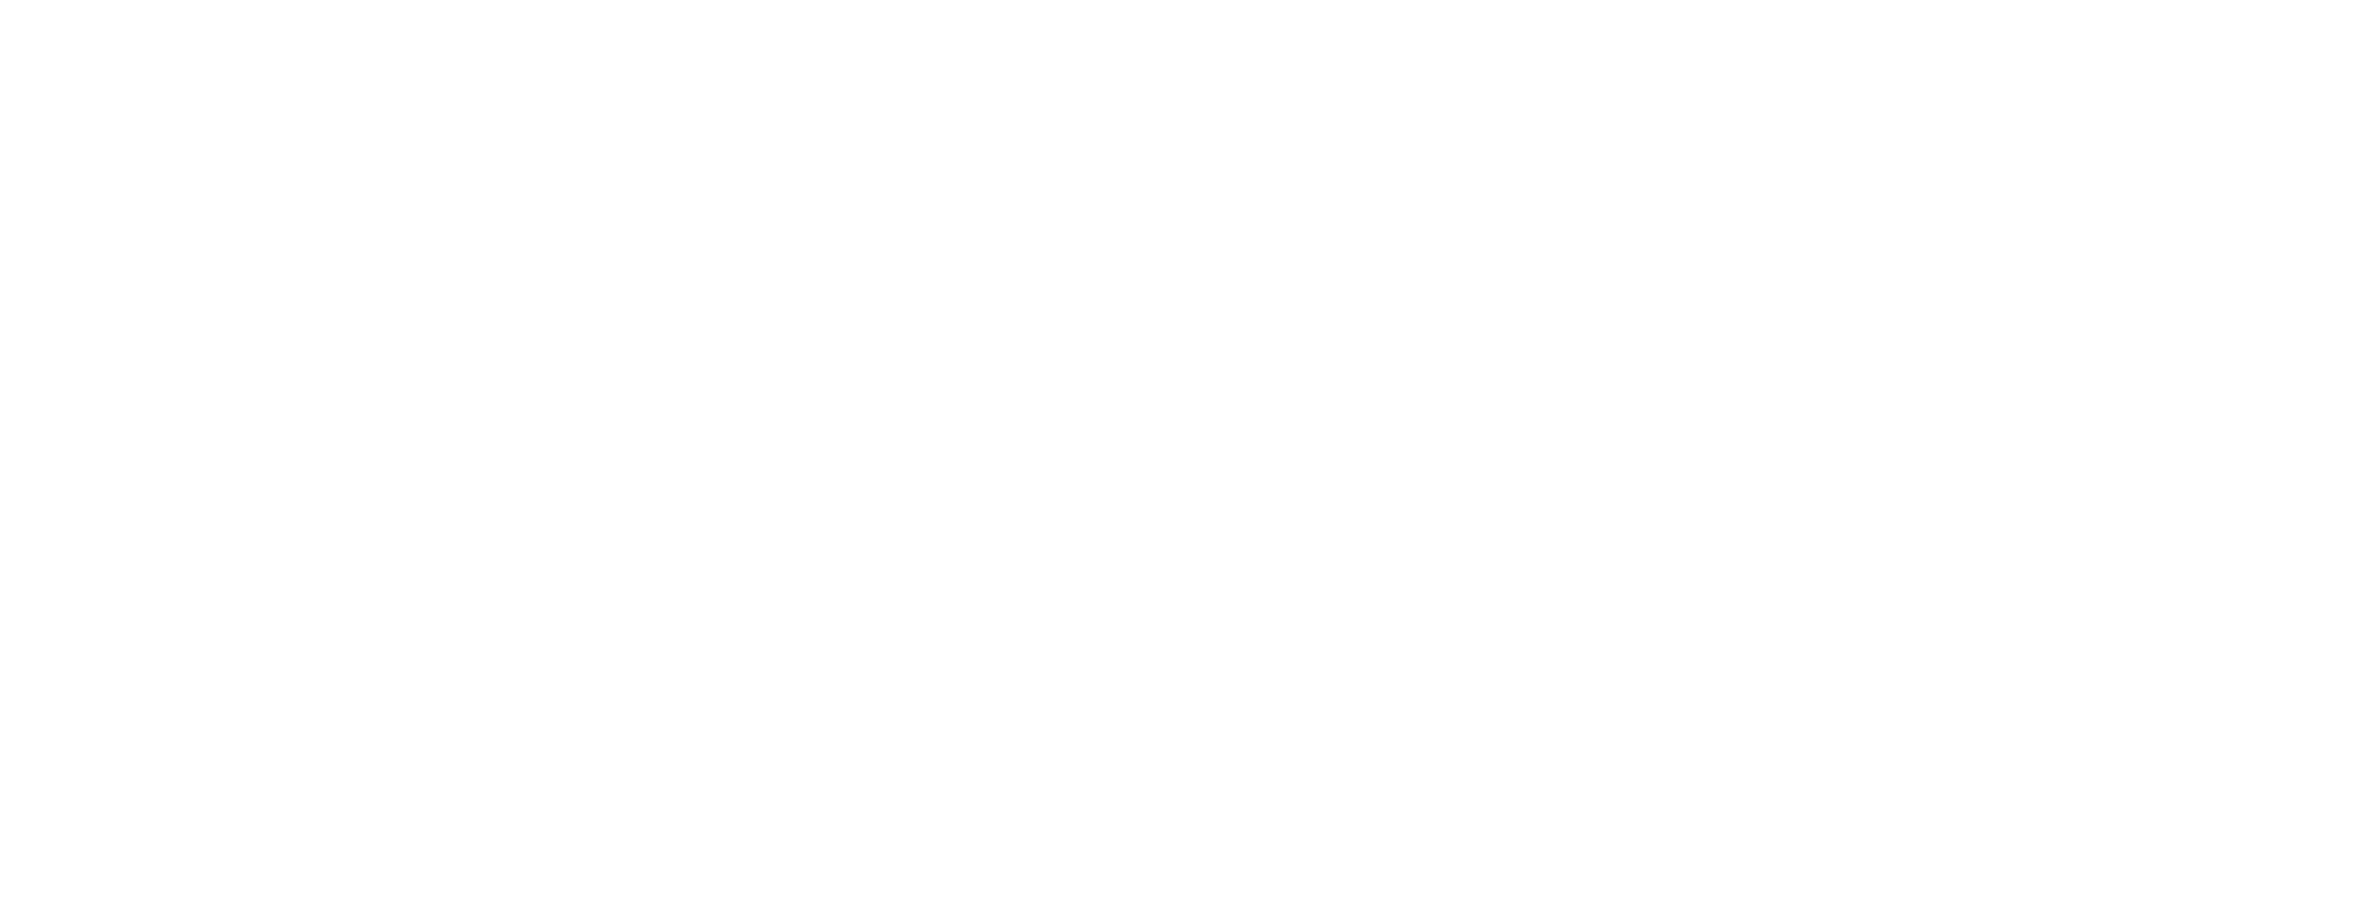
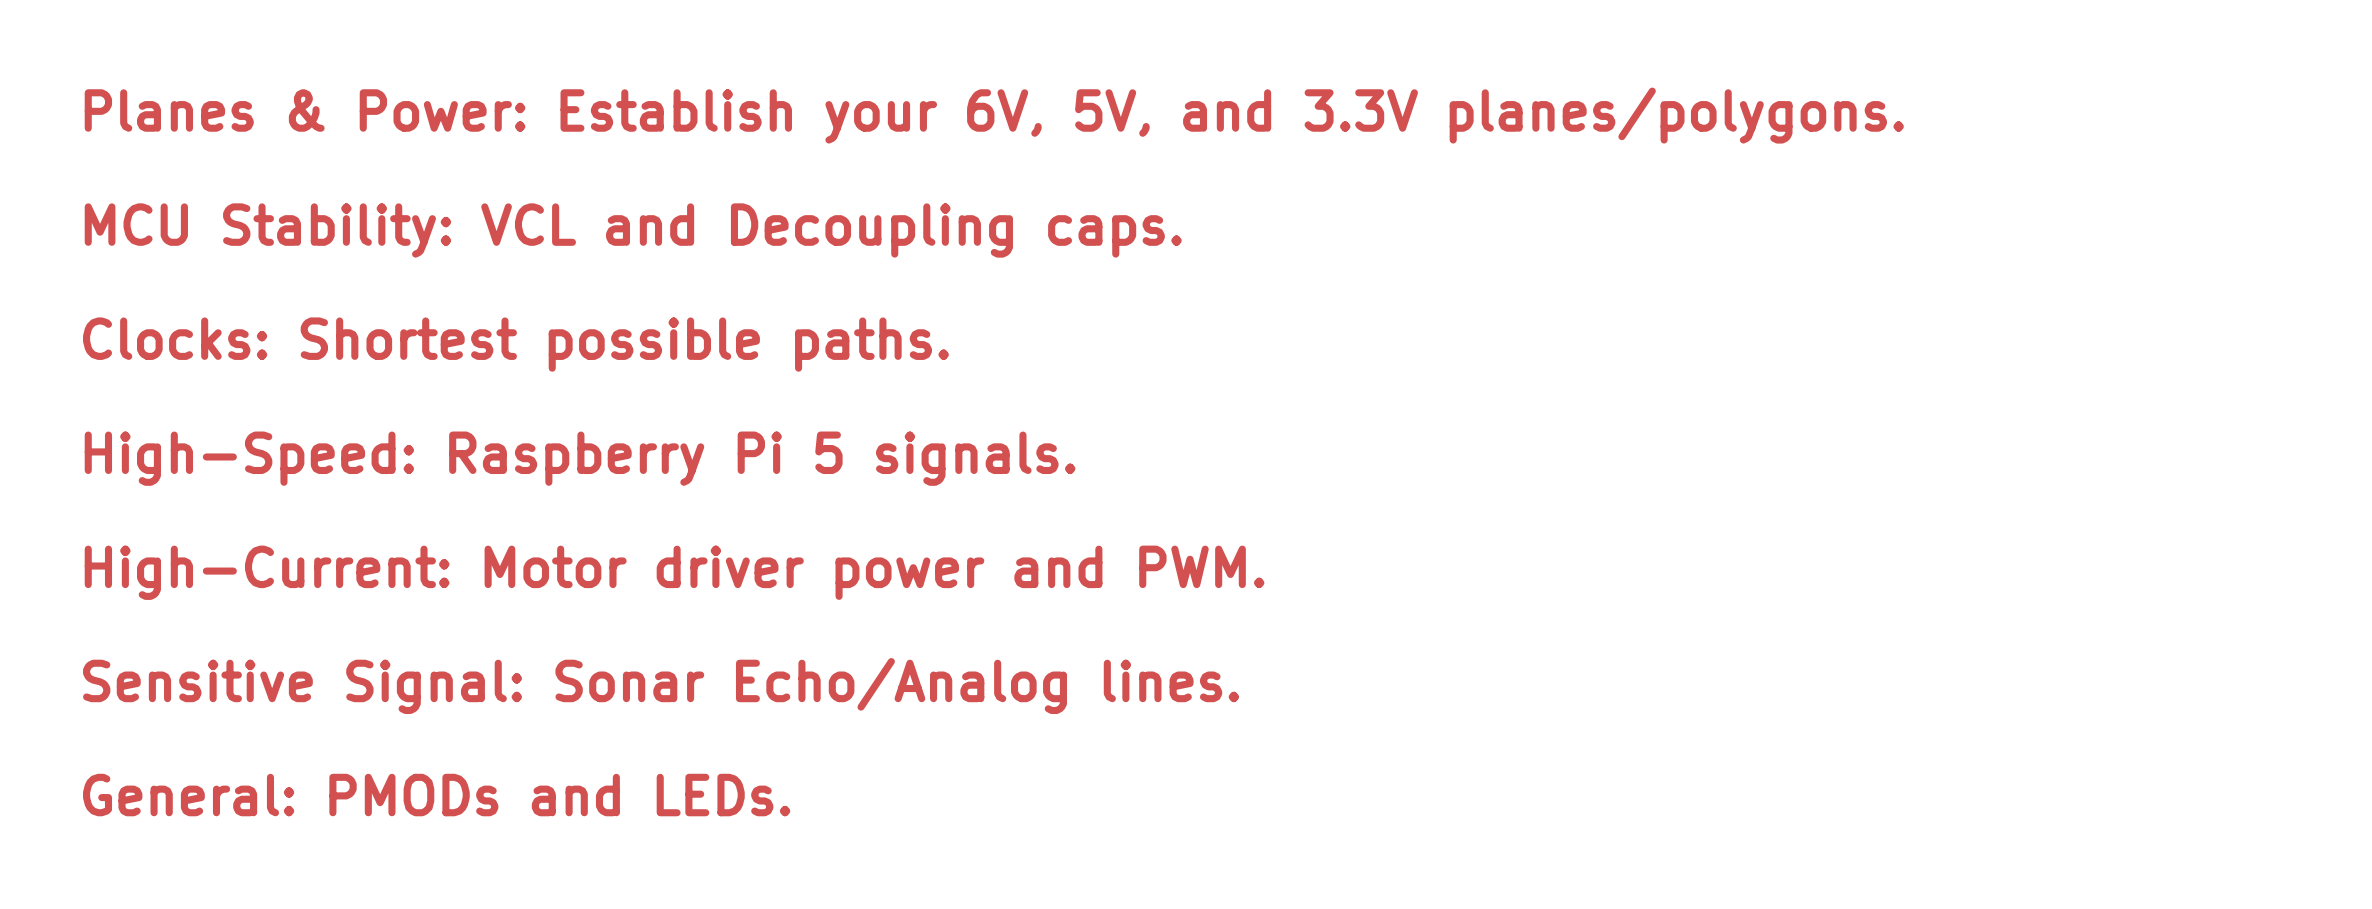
text: none -> Planes & Power: Establish your 6V, 5V, and 3.3V planes/polygons. (994, 115)
text: none -> MCU Stability: VCL and Decoupling caps. (633, 230)
text: none -> Clocks: Shortest possible paths. (515, 344)
text: none -> High-Speed: Raspberry Pi 5 signals. (580, 458)
text: none -> High-Current: Motor driver power and PWM. (674, 572)
text: none -> Sensitive Signal: Sonar Echo/Analog lines. (661, 686)
text: none -> General: PMODs and LEDs. (436, 795)

